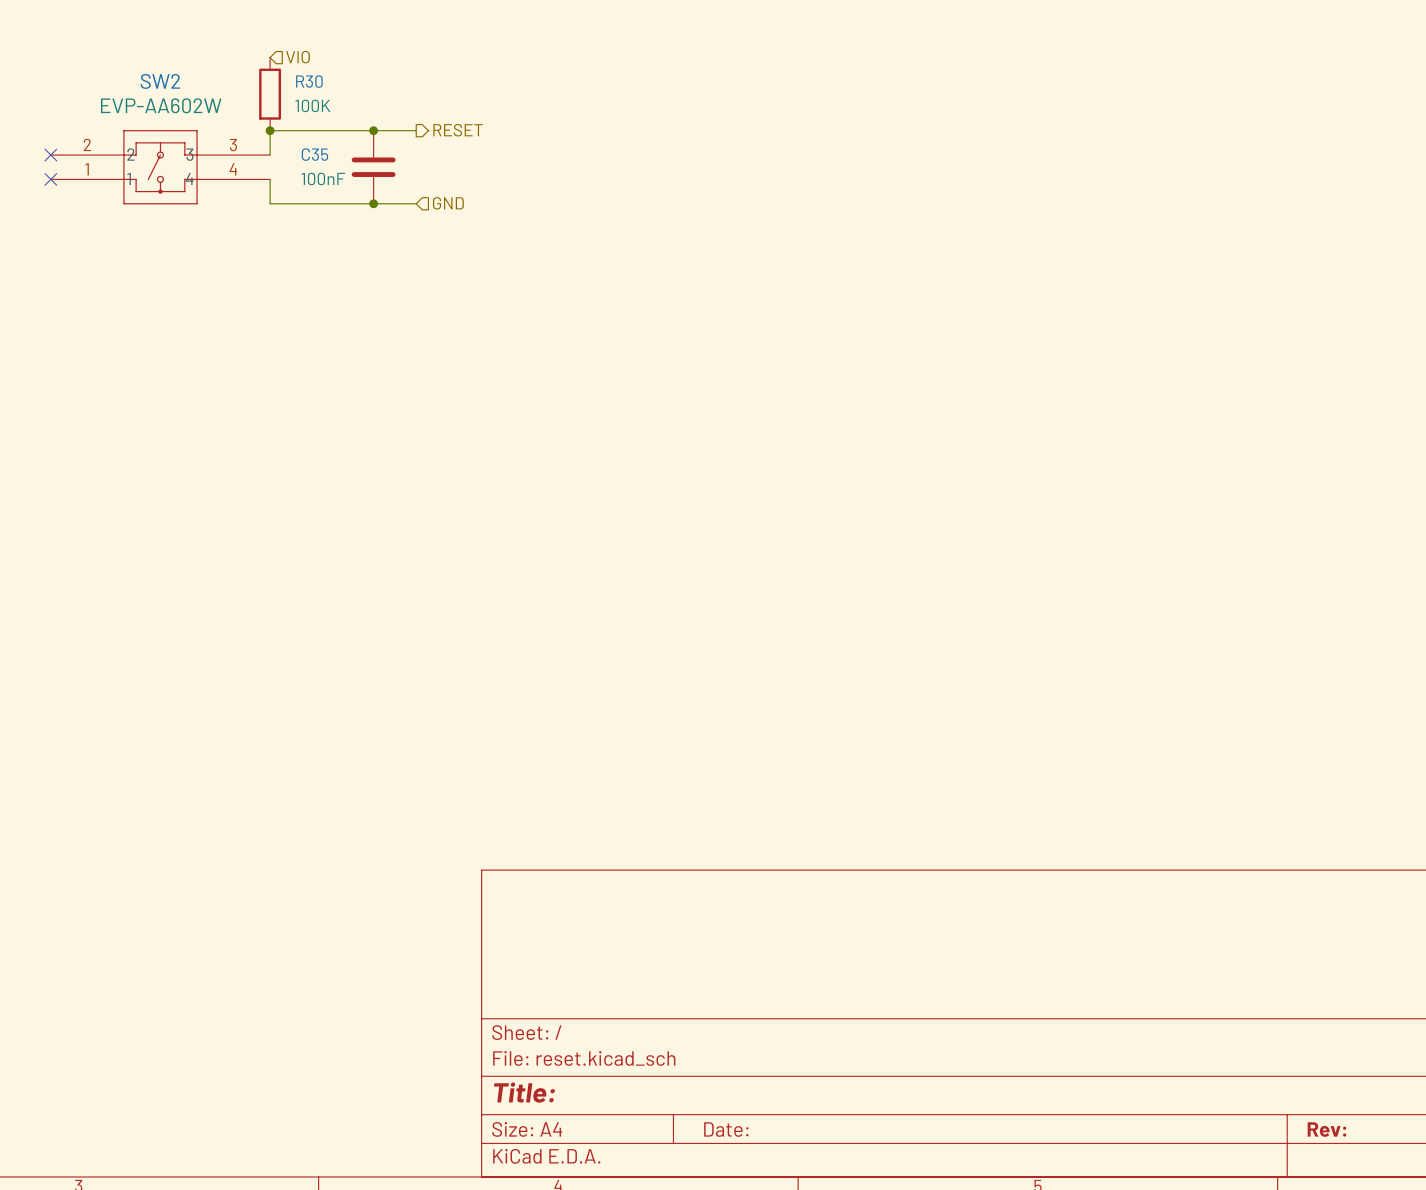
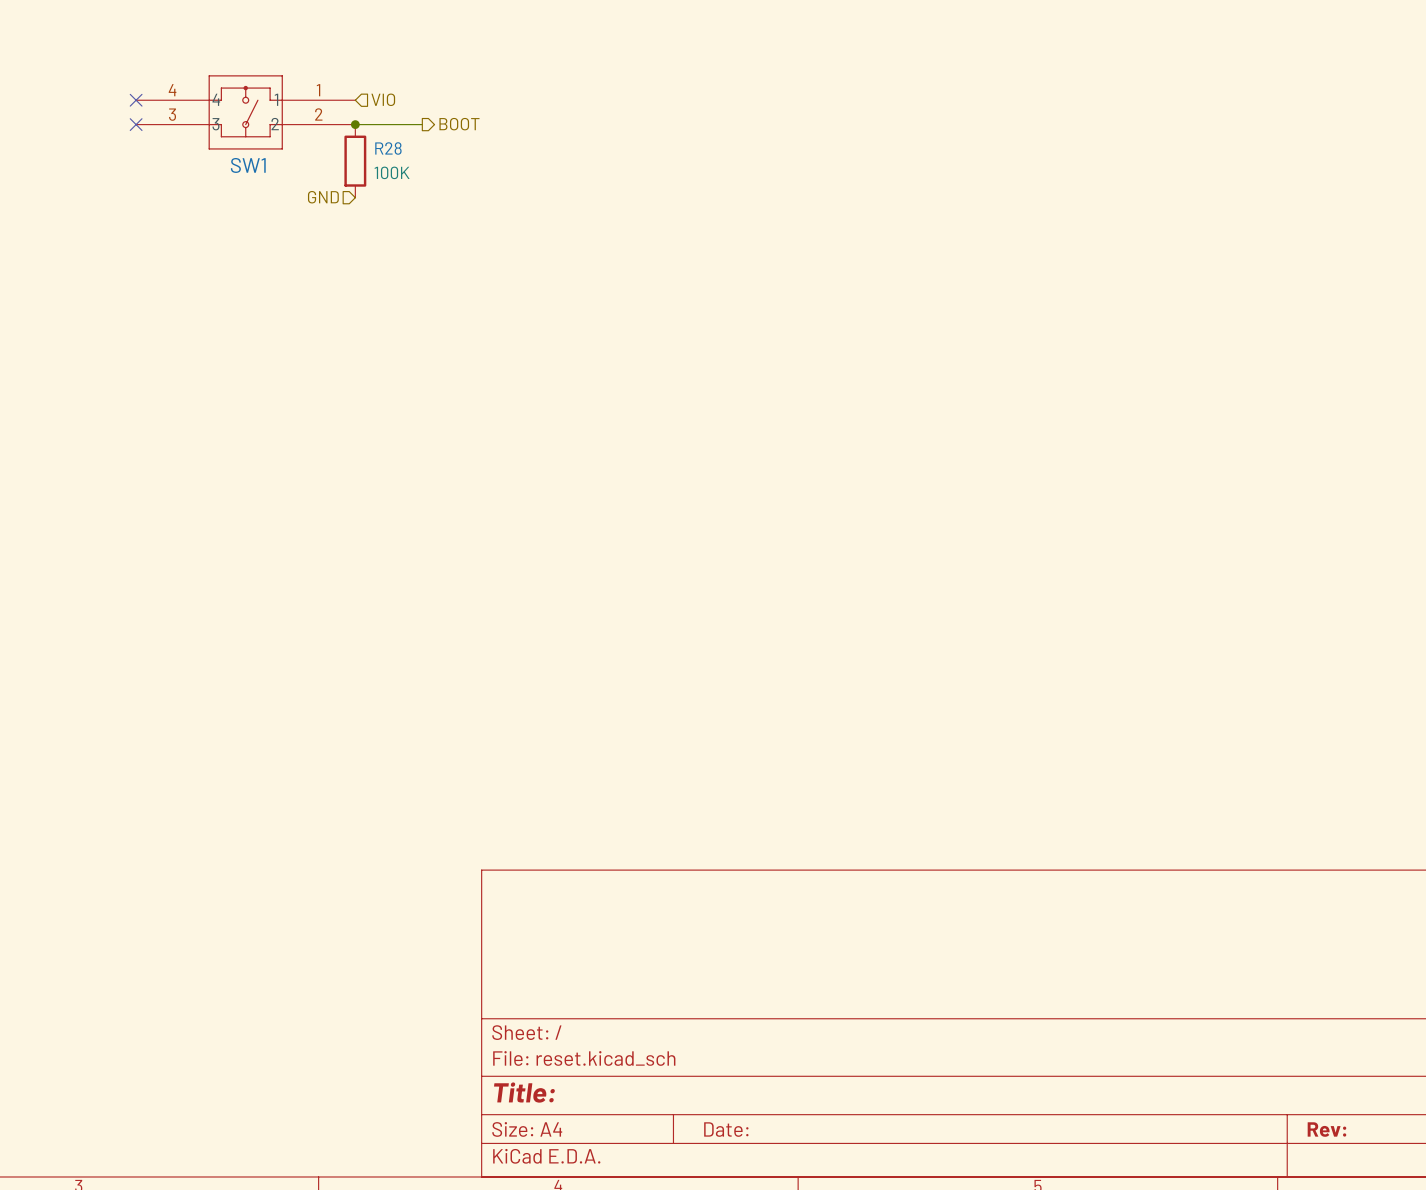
hierarchical label position: VIO (298, 57) -> VIO (383, 99)
R30: 100K (270, 94) -> none
no-connect mark: none -> (136, 100)
SW1: none -> (245, 112)
no-connect mark: none -> (136, 124)
wire: none -> (355, 124) (422, 124)
junction: (270, 130) -> none
junction position: (373, 130) -> (355, 124)
wire: (416, 130) (270, 130) (270, 155) -> none
hierarchical label: RESET (458, 130) -> BOOT (459, 124)
no-connect mark: (50, 155) -> none
R28: none -> 100K (355, 161)
SW2: EVP-AA602W (160, 167) -> none
C35: 100nF (373, 167) -> none
no-connect mark: (50, 179) -> none
wire: (270, 179) (270, 203) (416, 203) -> none
junction: (373, 203) -> none
hierarchical label rotation: 0° (448, 203) -> 180° (323, 197)
hierarchical label position: GND (448, 203) -> GND (323, 197)

